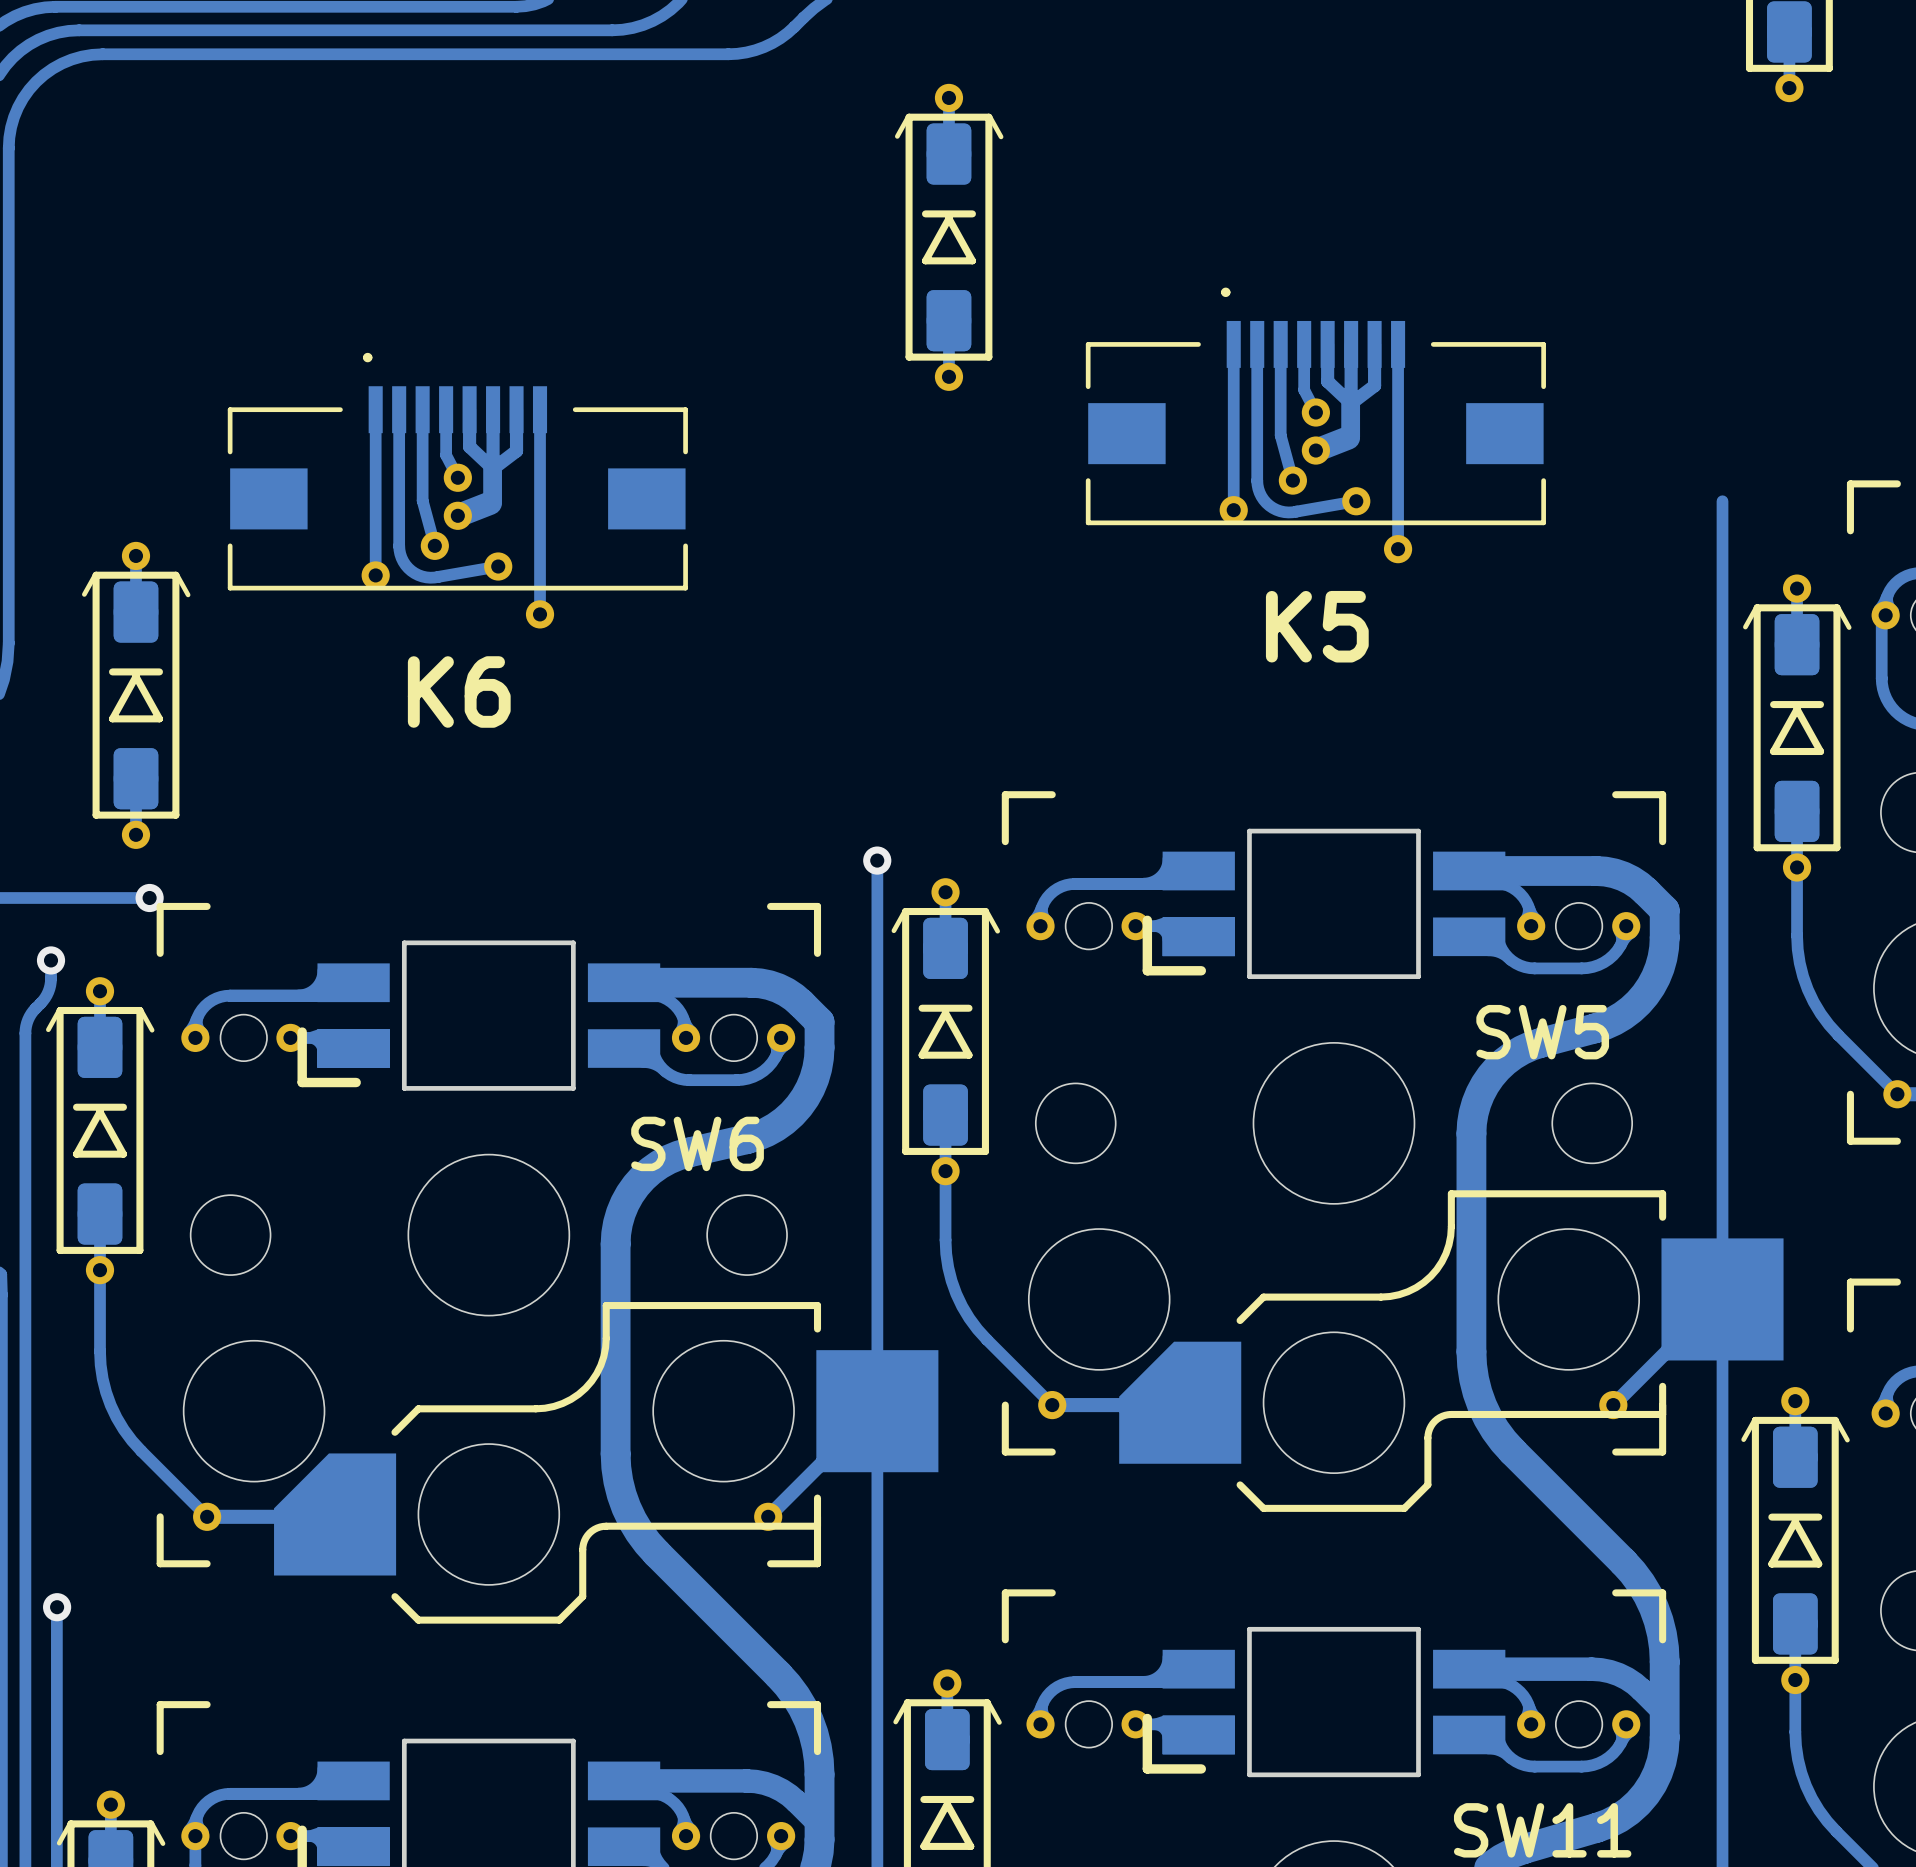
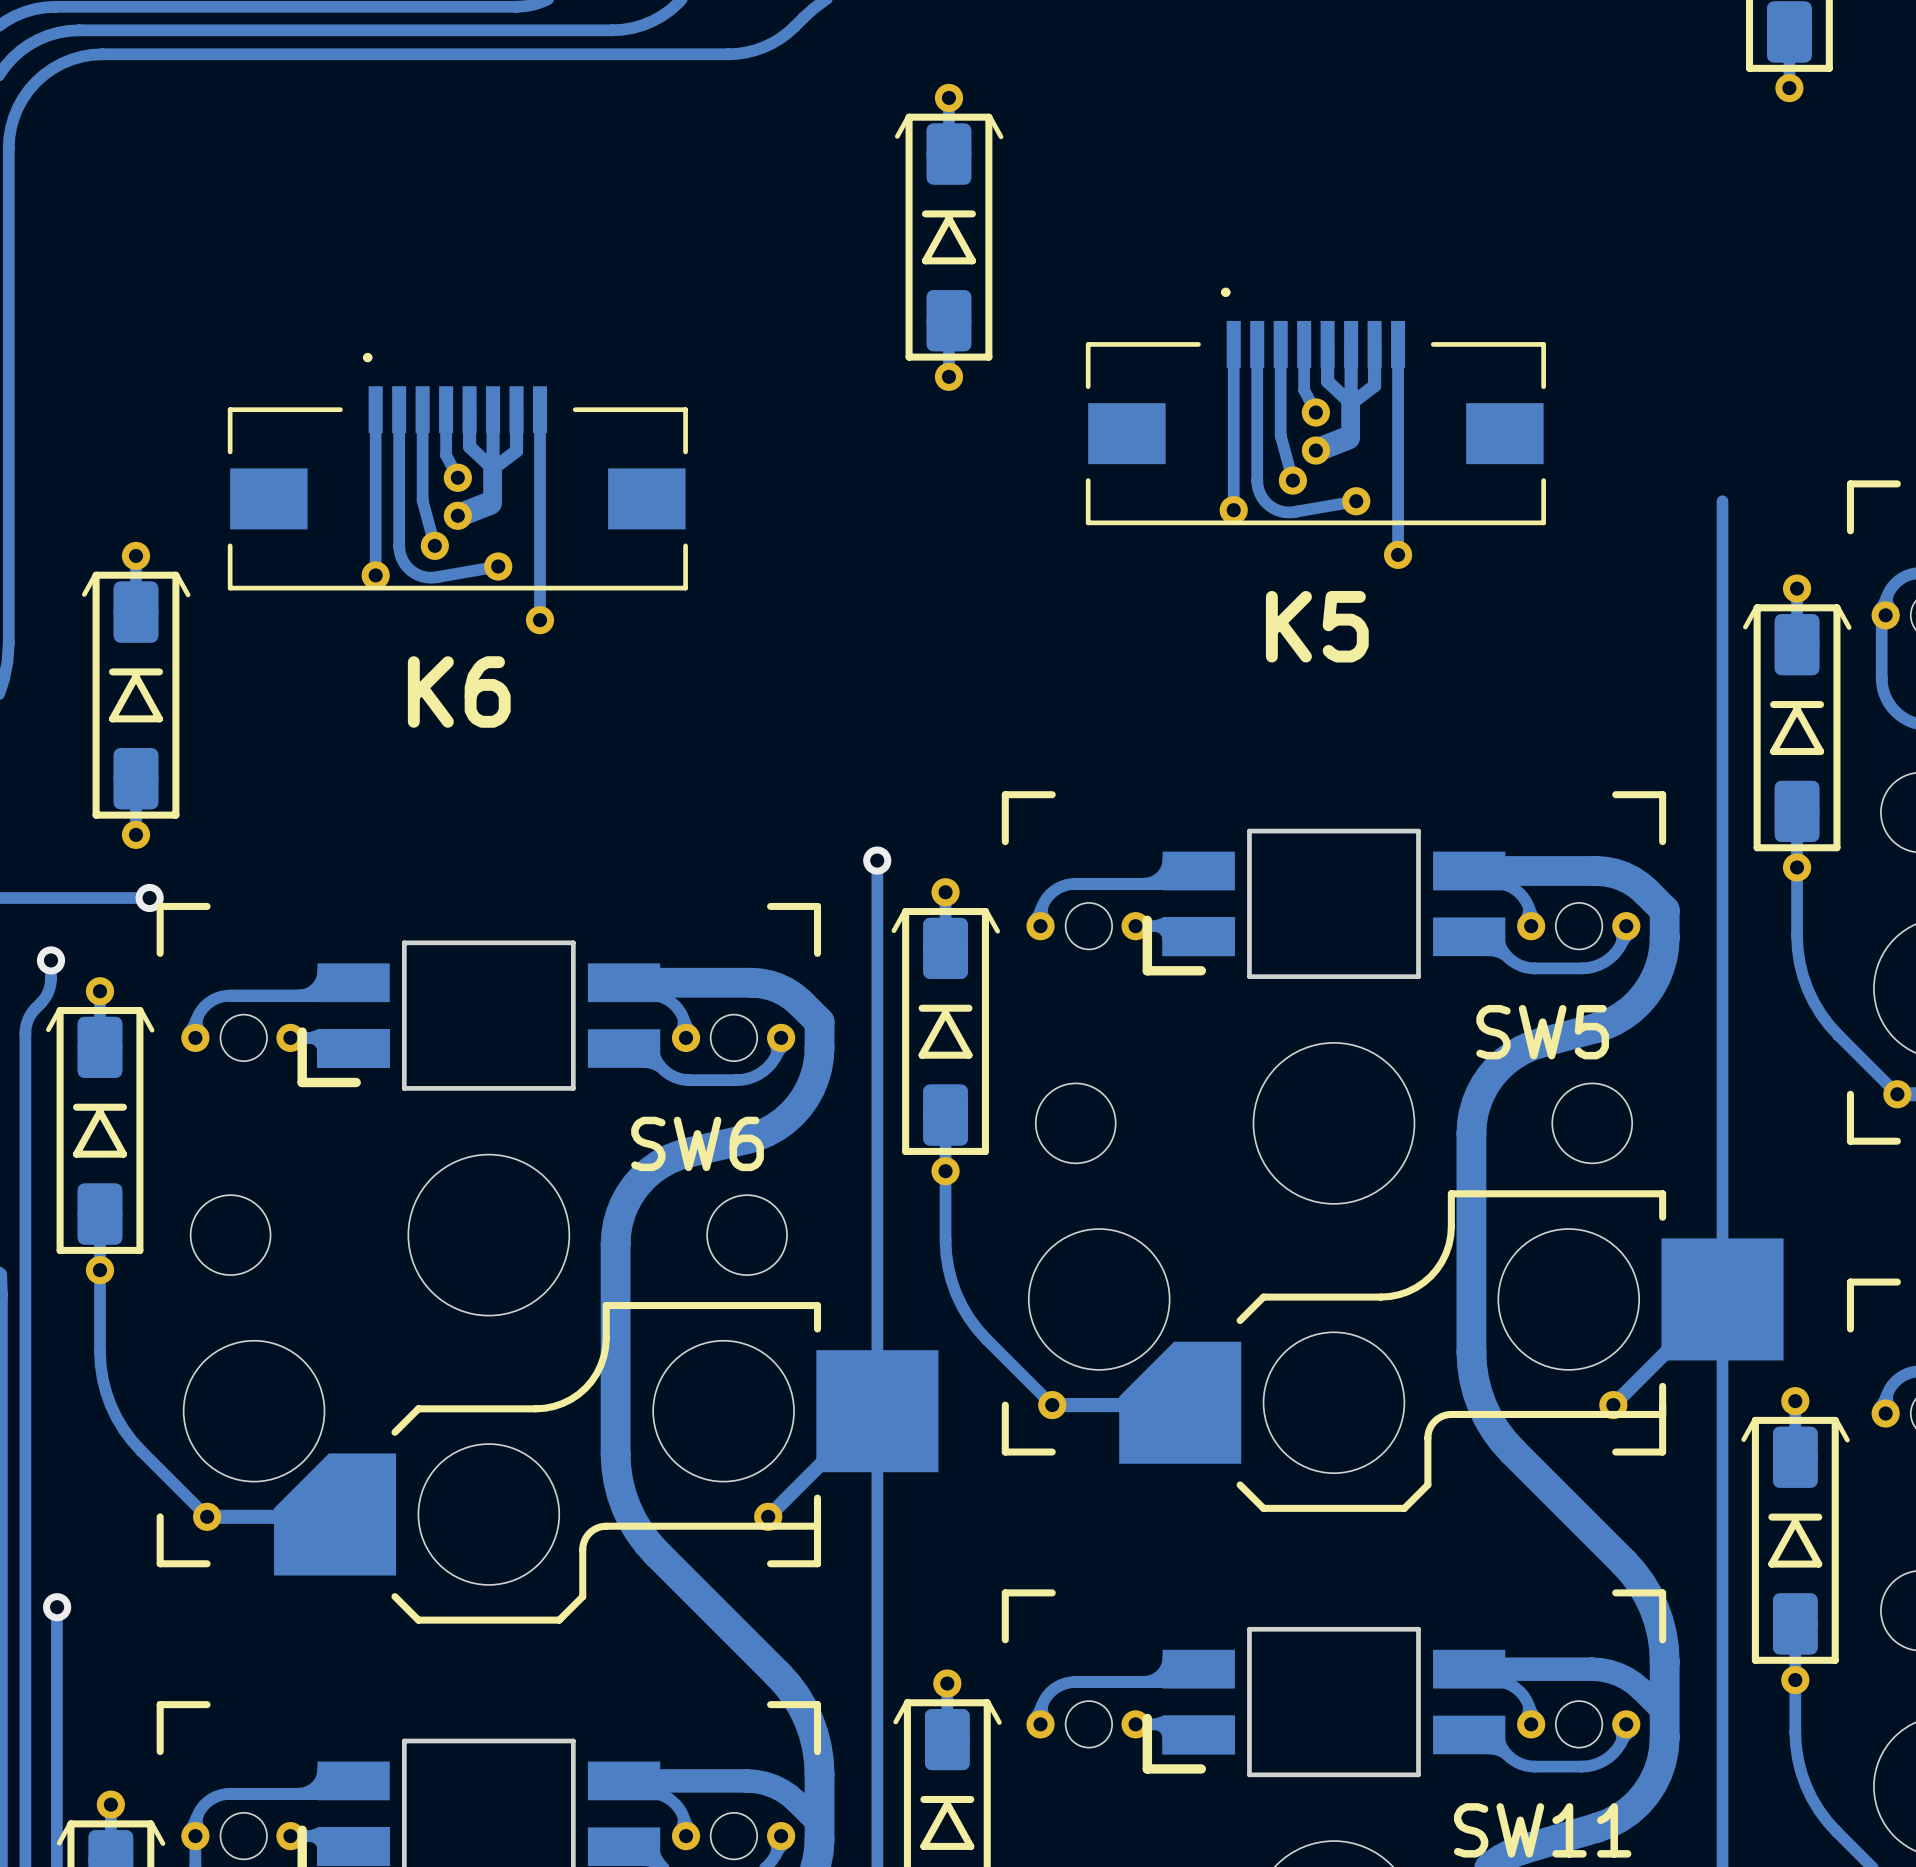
K5 footprint: [1085, 287, 1546, 564] -> [1085, 287, 1546, 569]
K6 footprint: [227, 352, 688, 629] -> [227, 352, 688, 635]

